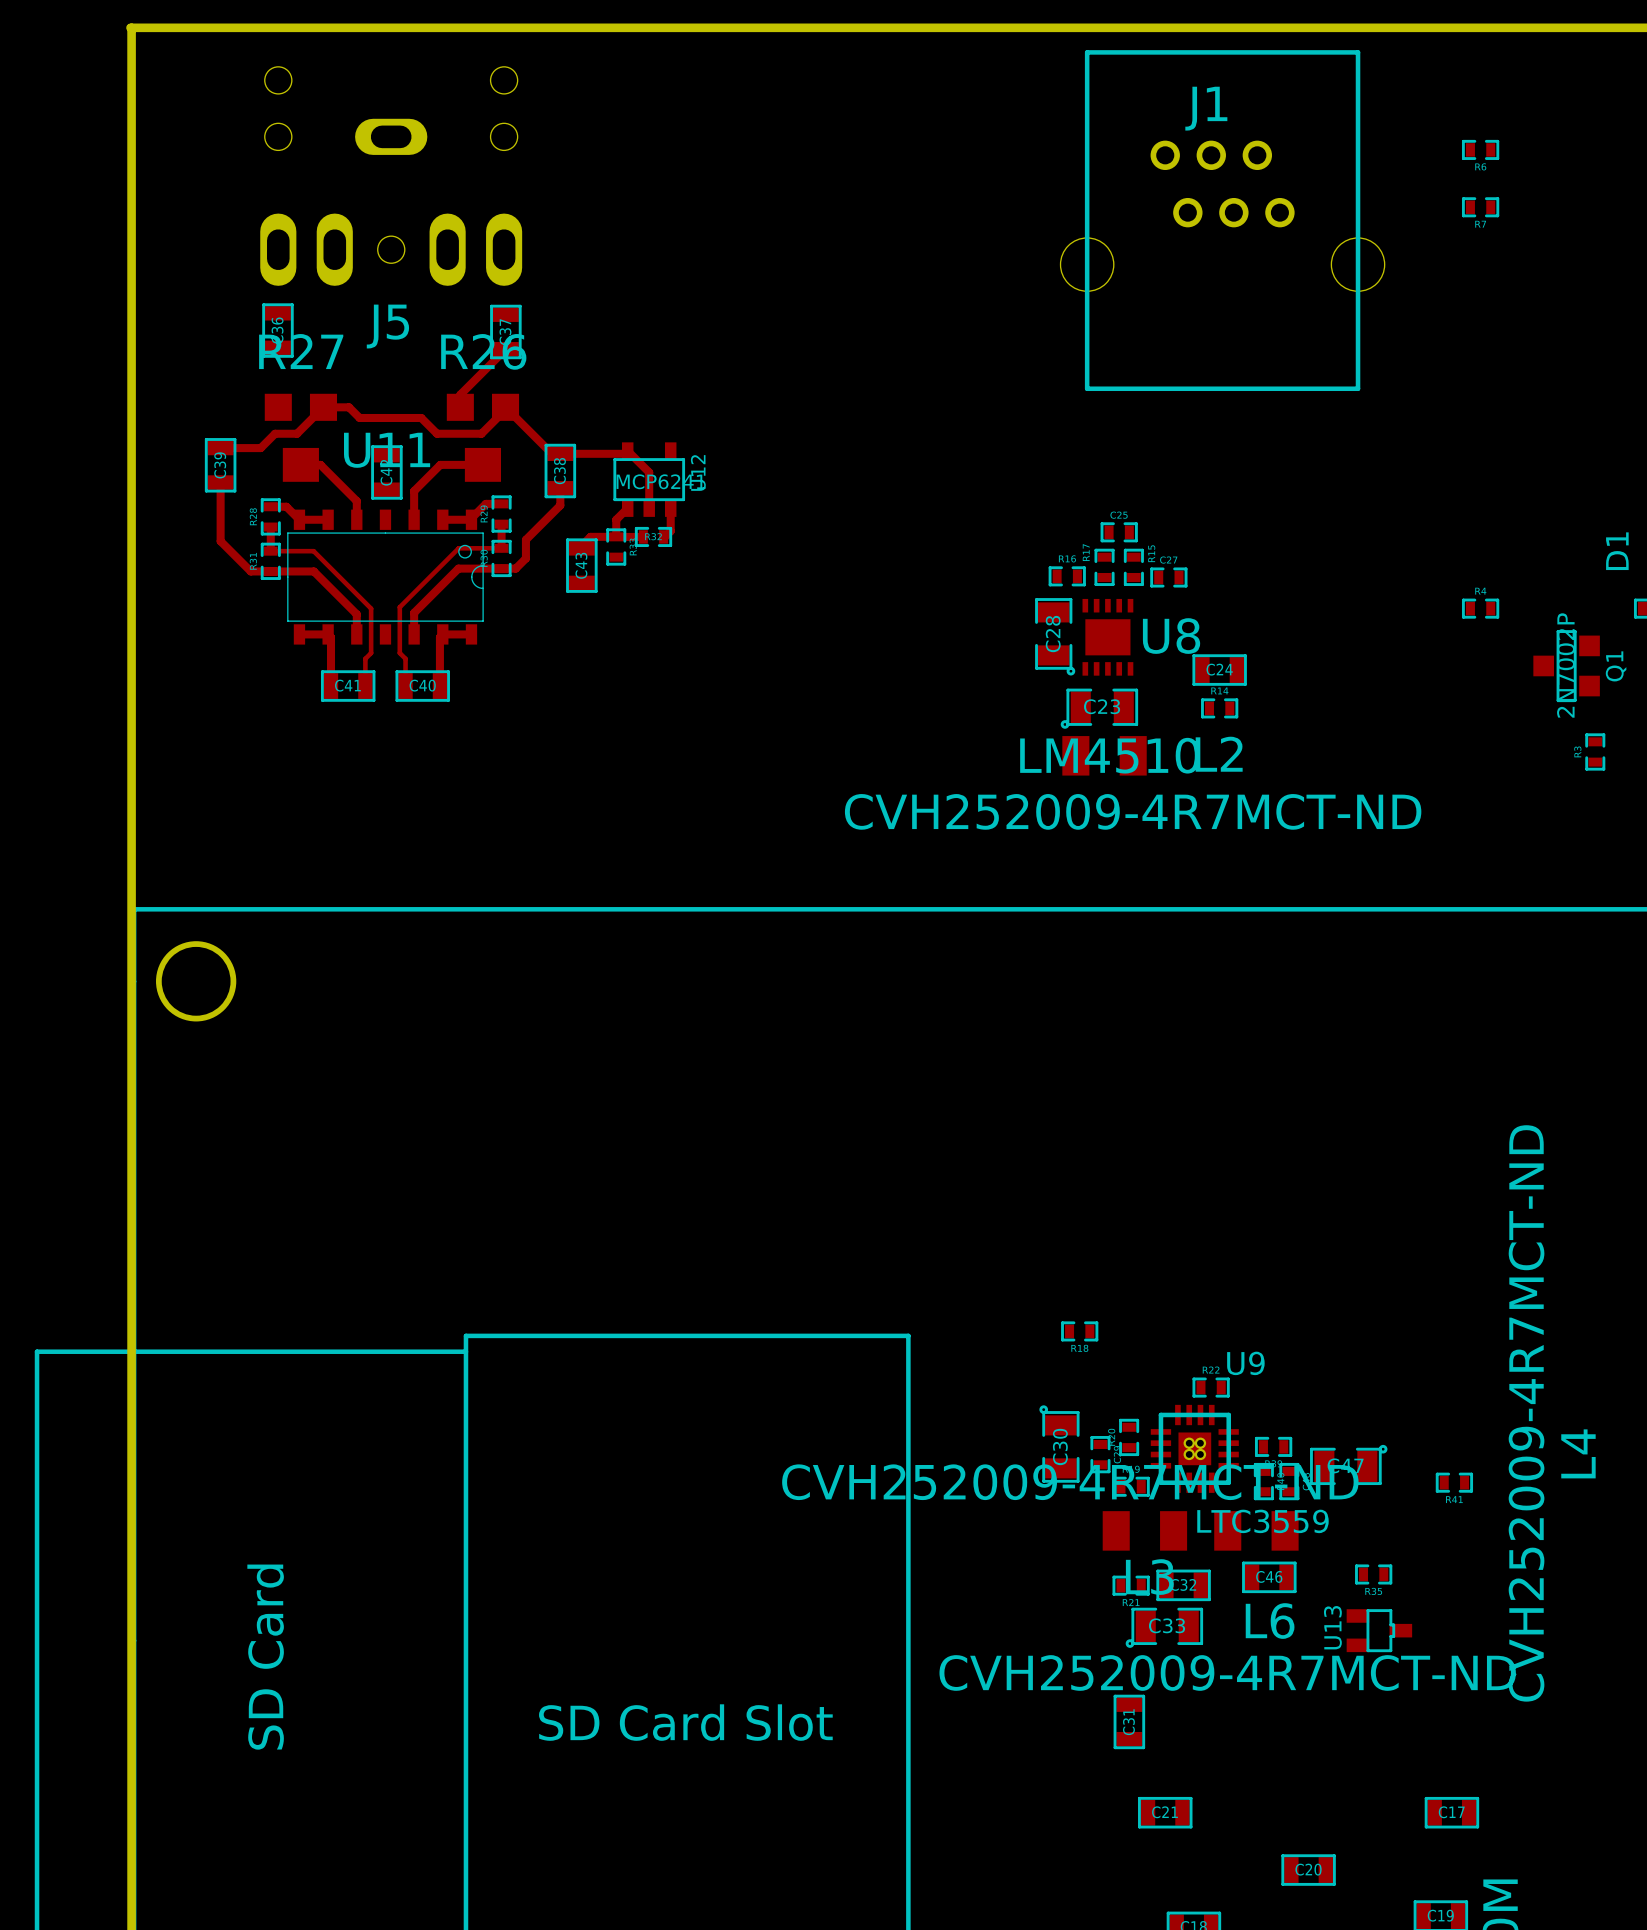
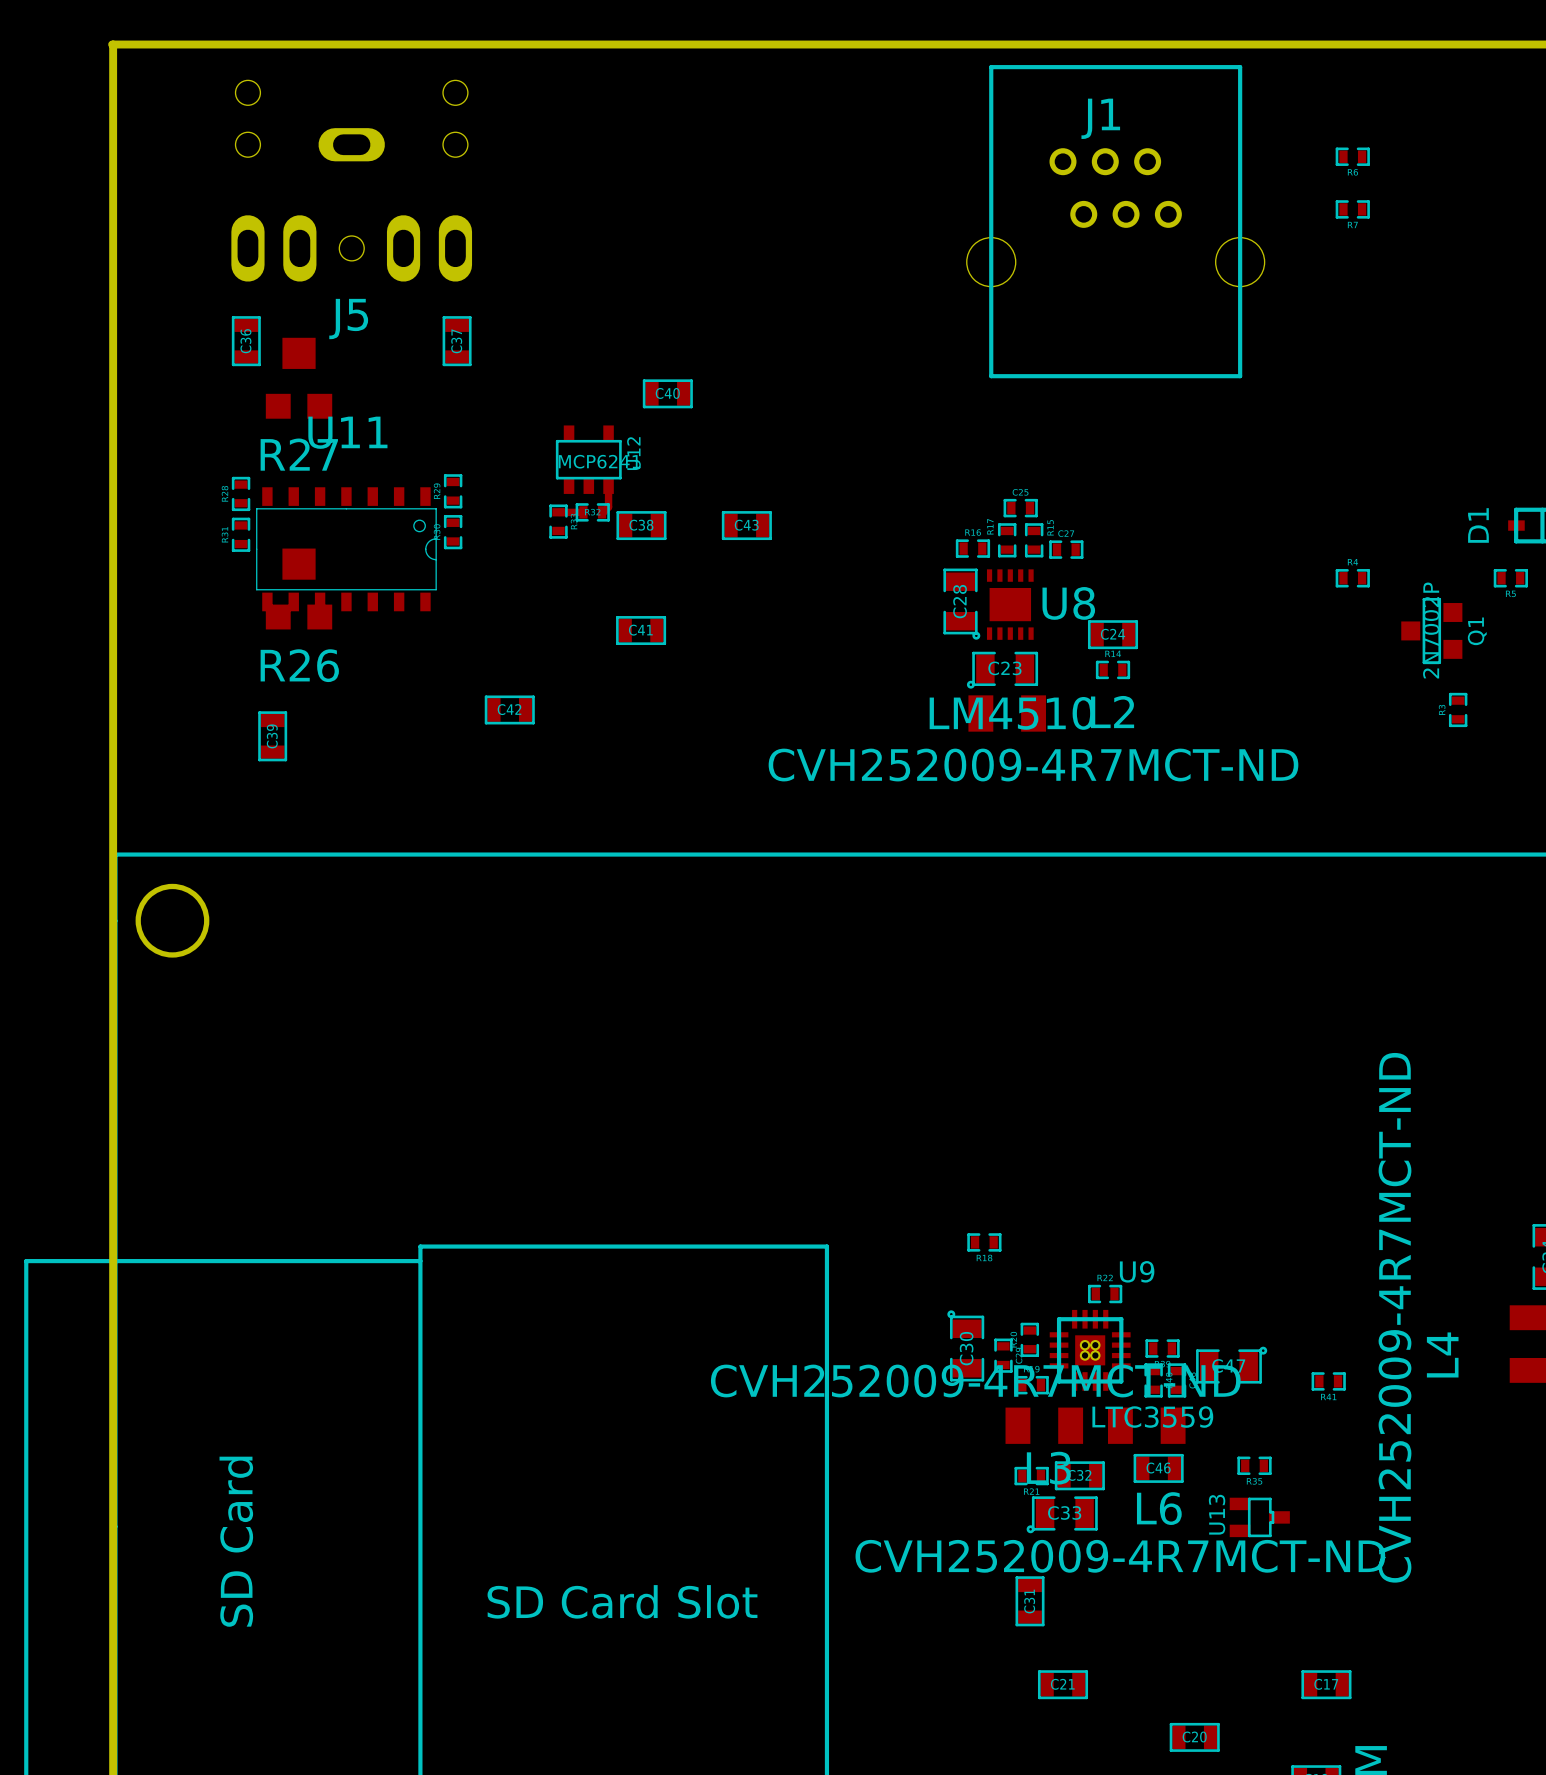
C36 position: (277, 330) -> (246, 341)
C37 position: (505, 331) -> (457, 341)
top track: (505, 349) (460, 394) (460, 407) -> none
R27 rotation: 0° (300, 437) -> 180° (299, 378)
R27 position: (300, 437) -> (299, 378)
R26 rotation: 0° (482, 437) -> 180° (299, 589)
R26 position: (482, 437) -> (299, 589)
top track: (220, 448) (260, 448) (275, 433) (297, 433) (323, 407) (349, 407) (359, 417) (421, 417) (437, 433) (481, 433) (505, 409) (505, 407) (552, 453) (624, 453) (627, 450) (649, 472) (649, 508) -> none
top track: (300, 464) (320, 464) (356, 501) (356, 519) -> none
top track: (482, 464) (440, 464) (414, 491) (414, 519) -> none
C39 position: (220, 465) -> (272, 736)
C38 rotation: 0° (560, 471) -> 90° clockwise (641, 525)
C38 position: (560, 471) -> (641, 525)
C42 rotation: 0° (386, 472) -> 90° clockwise (509, 709)
C42 position: (386, 472) -> (509, 709)
top track: (220, 482) (220, 541) (250, 571) (313, 571) (356, 614) (356, 634) -> none
top track: (560, 488) (560, 505) (525, 539) (525, 558) (515, 568) (458, 568) (414, 612) (414, 634) -> none
top track: (501, 503) (485, 503) (471, 519) (442, 519) -> none
top track: (270, 506) (286, 506) (299, 519) (328, 519) -> none
top track: (627, 508) (616, 519) (616, 536) (590, 536) (581, 545) (581, 548) -> none
top track: (501, 524) (501, 548) (458, 548) (399, 607) (399, 653) (405, 658) (405, 686) -> none
top track: (270, 527) (270, 551) (313, 551) (371, 608) (371, 653) (365, 658) (365, 686) -> none
C43 rotation: 0° (581, 565) -> 90° clockwise (746, 525)
C43 position: (581, 565) -> (746, 525)
top track: (299, 634) (328, 634) (331, 637) (331, 686) -> none
top track: (471, 634) (442, 634) (439, 637) (439, 686) -> none
C41 position: (348, 686) -> (641, 630)
C40 position: (422, 686) -> (667, 393)

